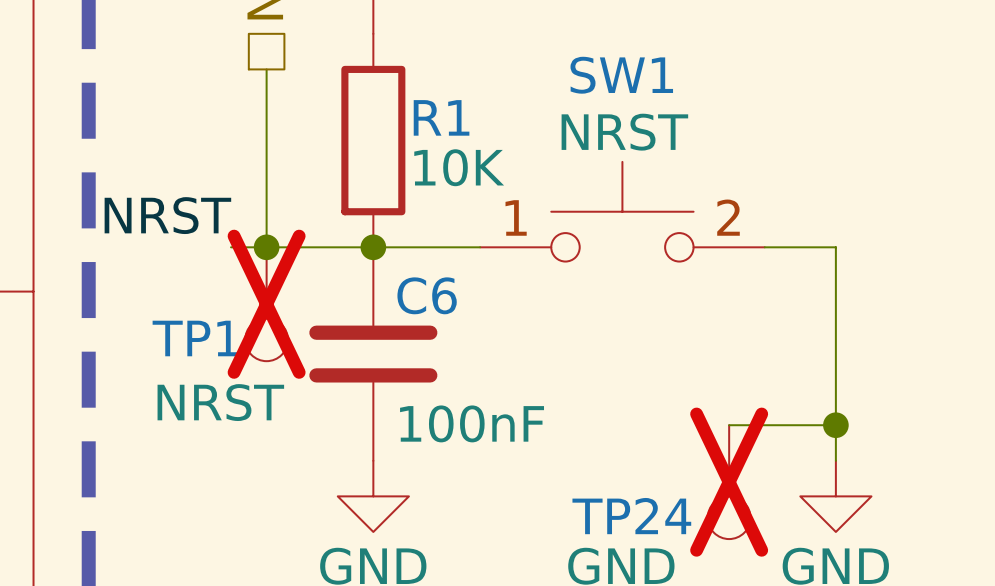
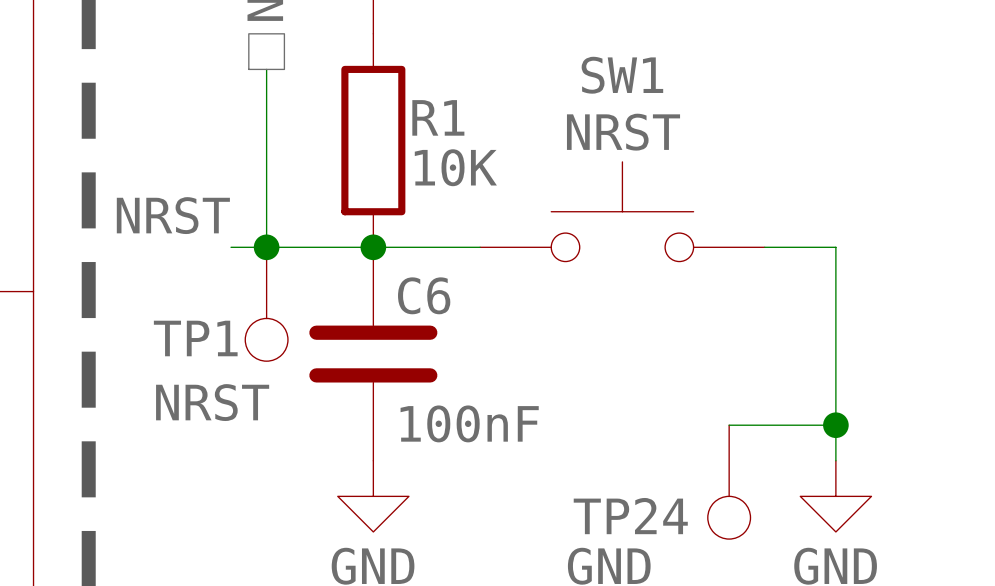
SW1 pin number: 1 (516, 217) -> none
SW1 pin number: 2 (728, 217) -> none
TP1 do-not-place cross: (266, 304) -> none
TP24 do-not-place cross: (729, 482) -> none

